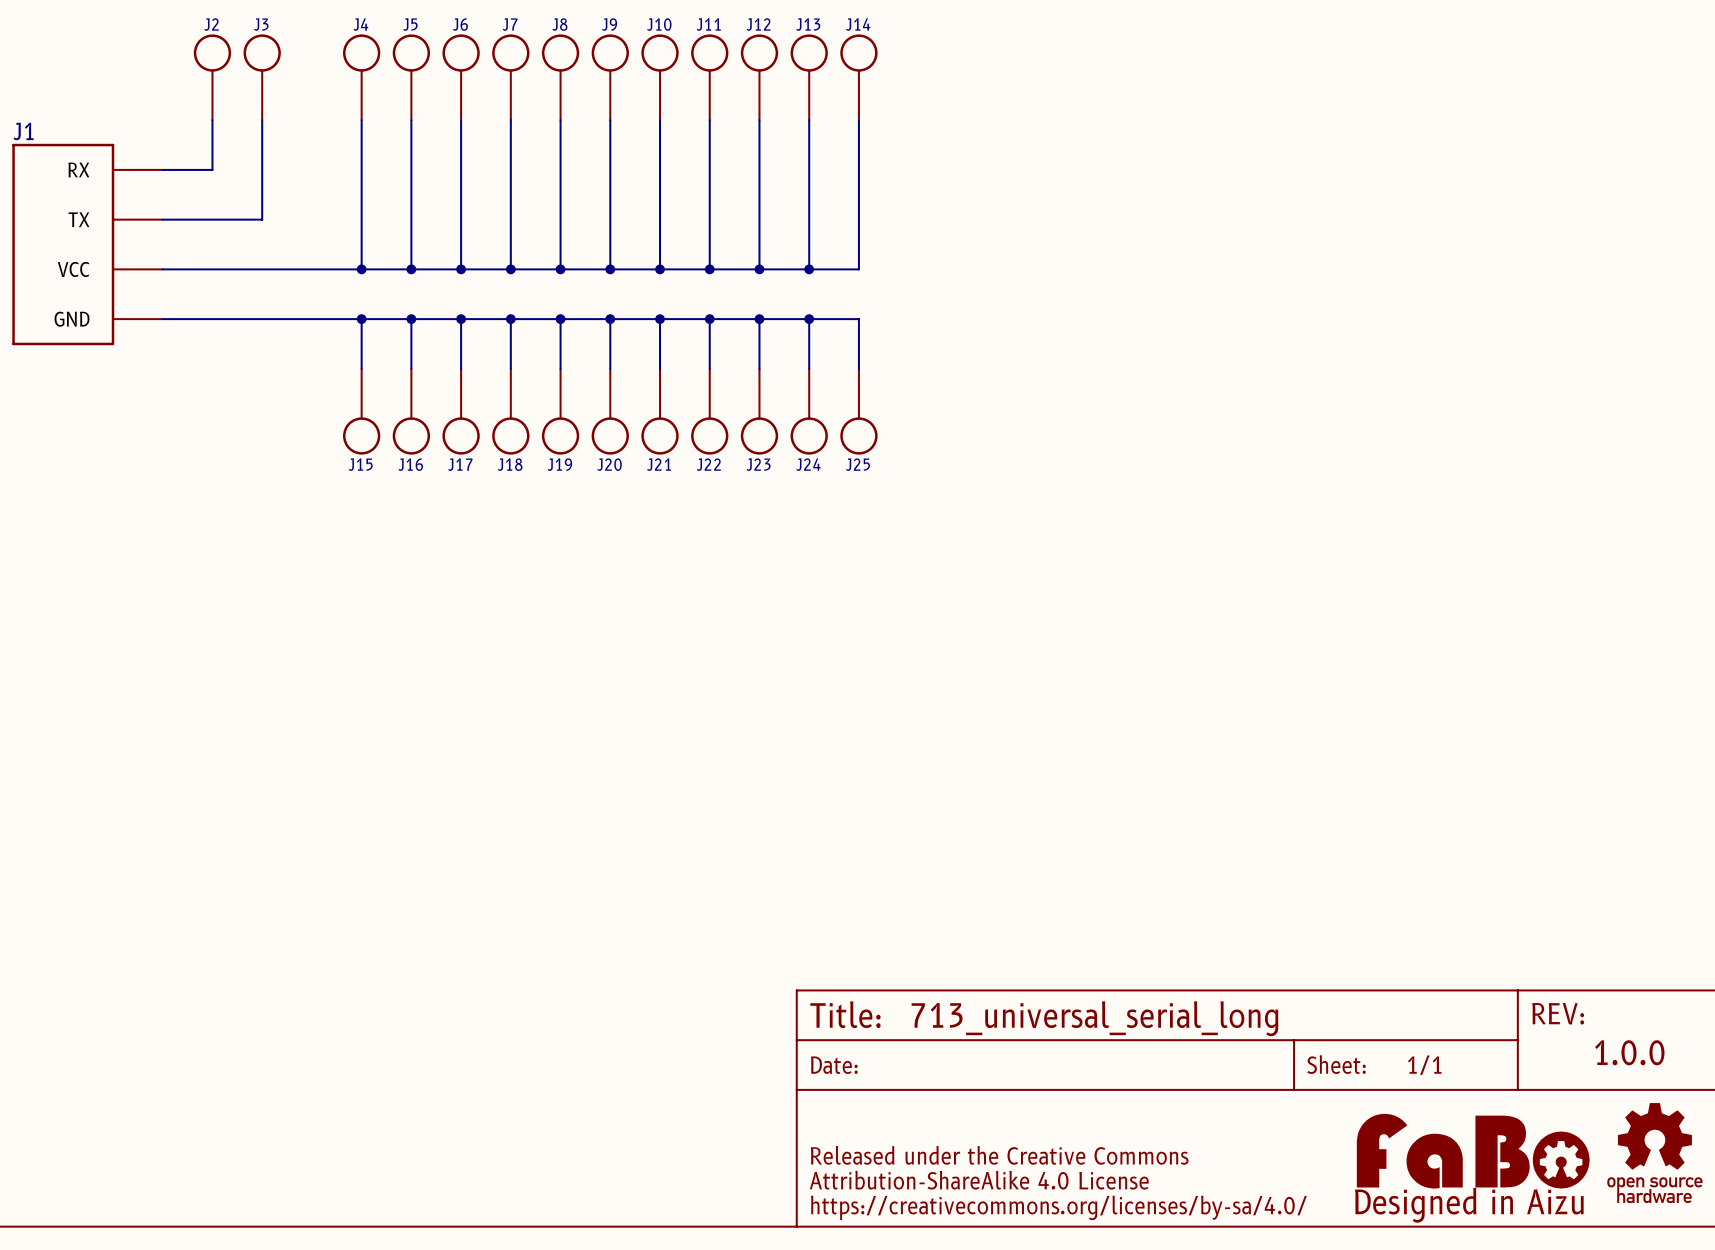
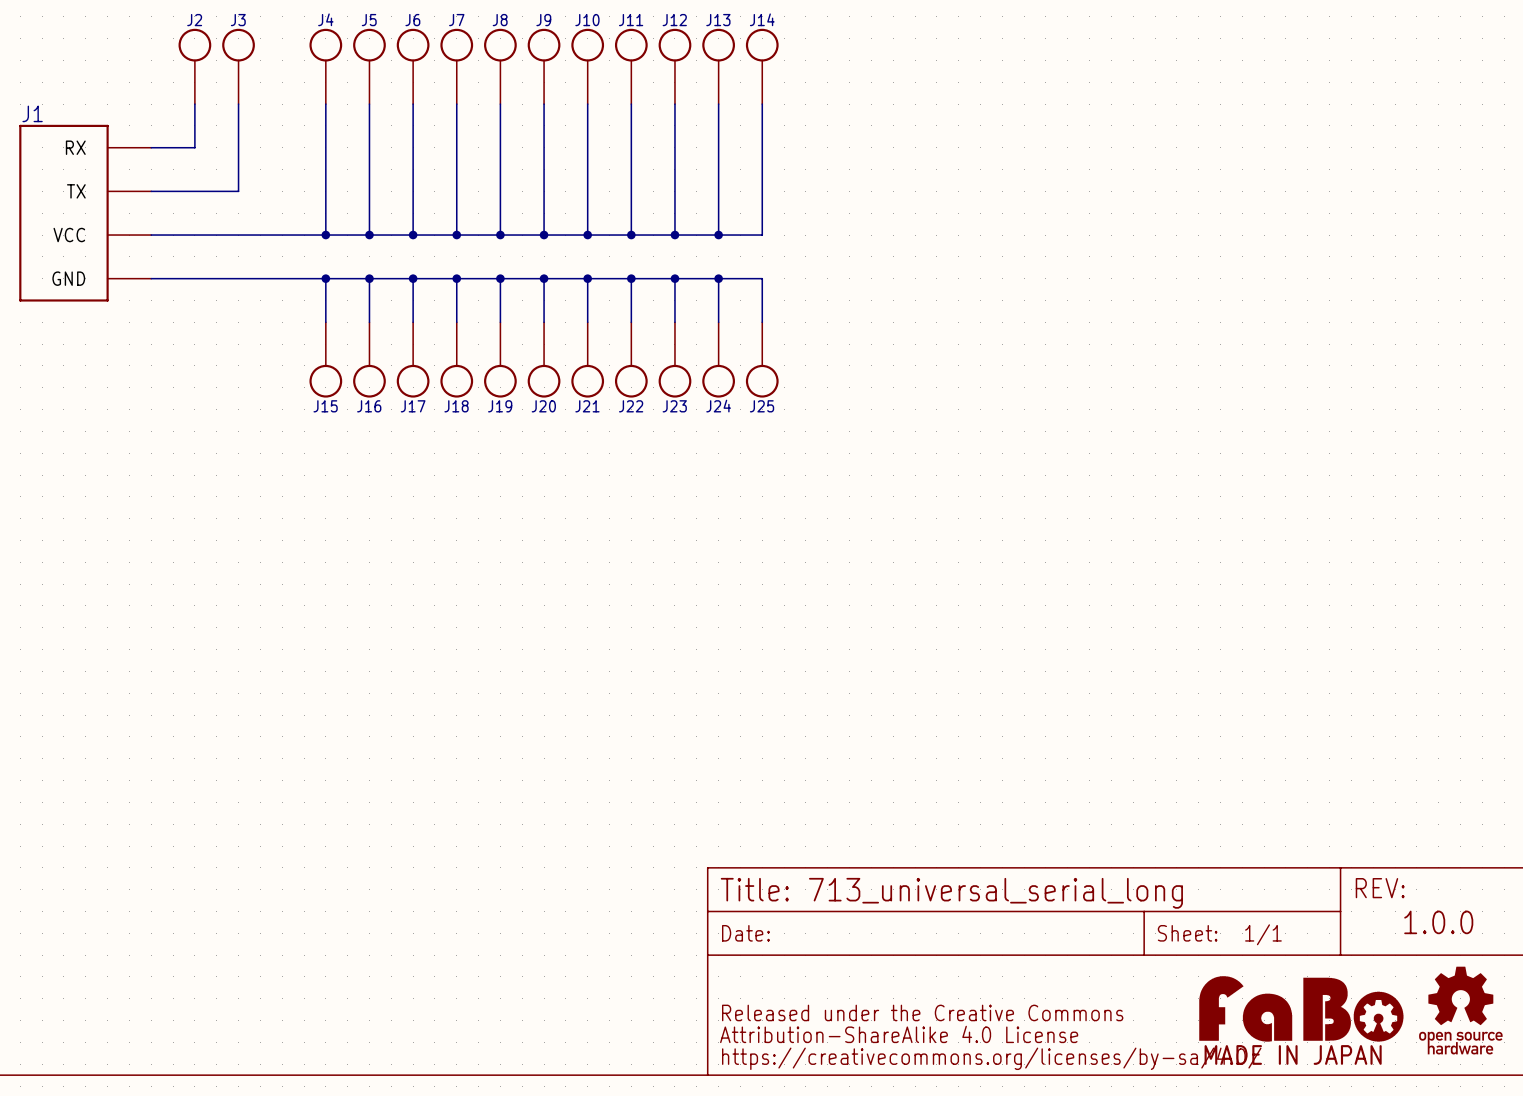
part text: none -> MADE IN JAPAN (1293, 1054)
part text: Designed in Aizu (1469, 1205) -> none

